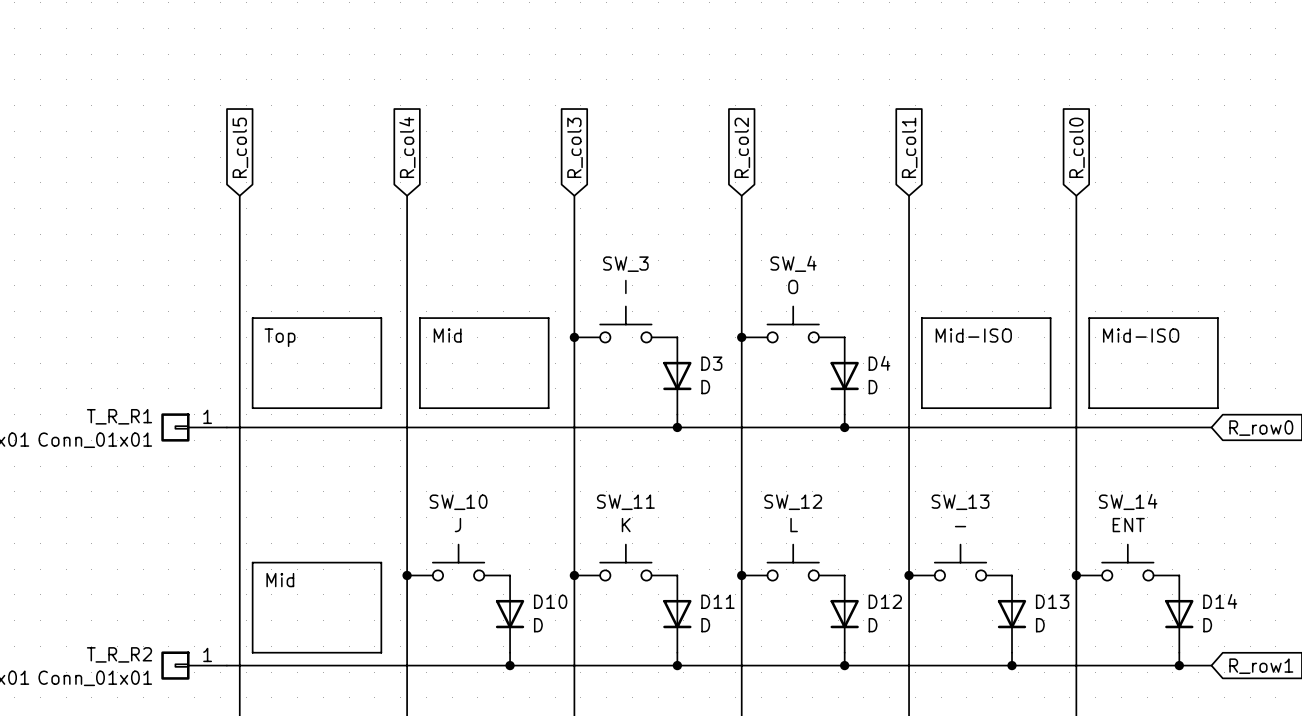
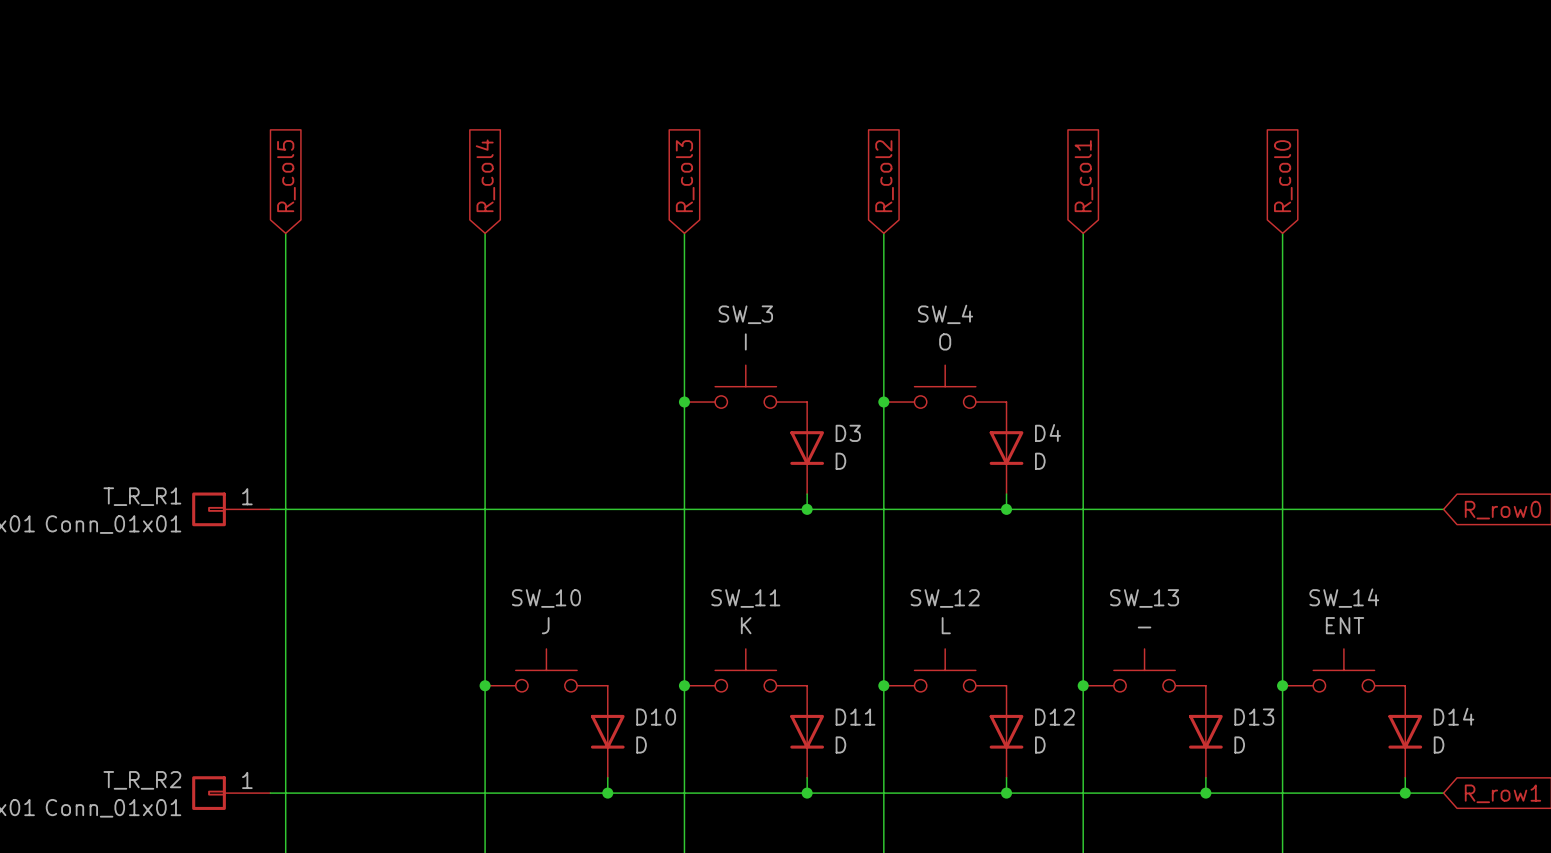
line: (252, 318) (381, 318) (381, 408) (252, 408) (252, 318) -> none
line: (419, 318) (548, 318) (548, 408) (419, 408) (419, 318) -> none
line: (921, 318) (1050, 318) (1050, 408) (921, 408) (921, 318) -> none
line: (1089, 318) (1217, 318) (1217, 408) (1089, 408) (1089, 318) -> none
text: Mid (447, 335) -> none
text: Mid-ISO (973, 335) -> none
text: Mid-ISO (1141, 335) -> none
text: Top (280, 337) -> none
line: (252, 562) (252, 652) (381, 652) (381, 562) (252, 562) -> none
text: Mid (280, 580) -> none

